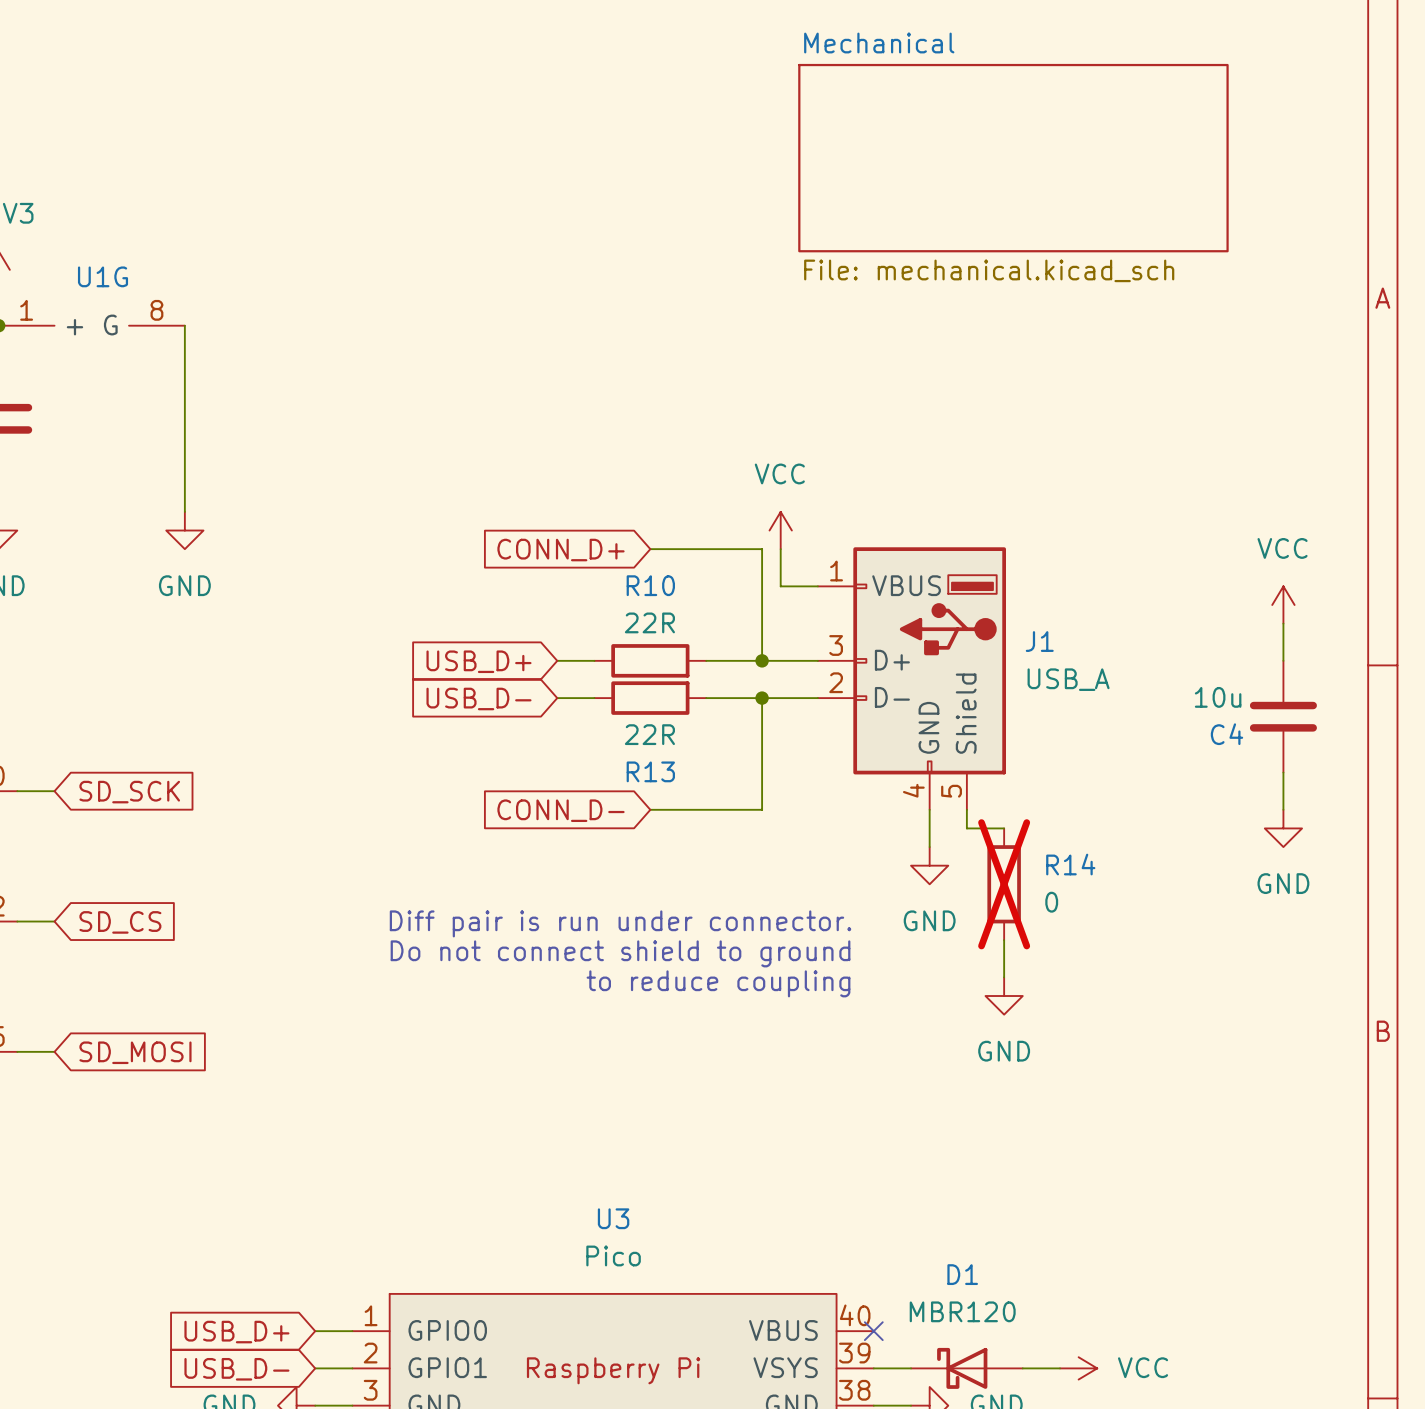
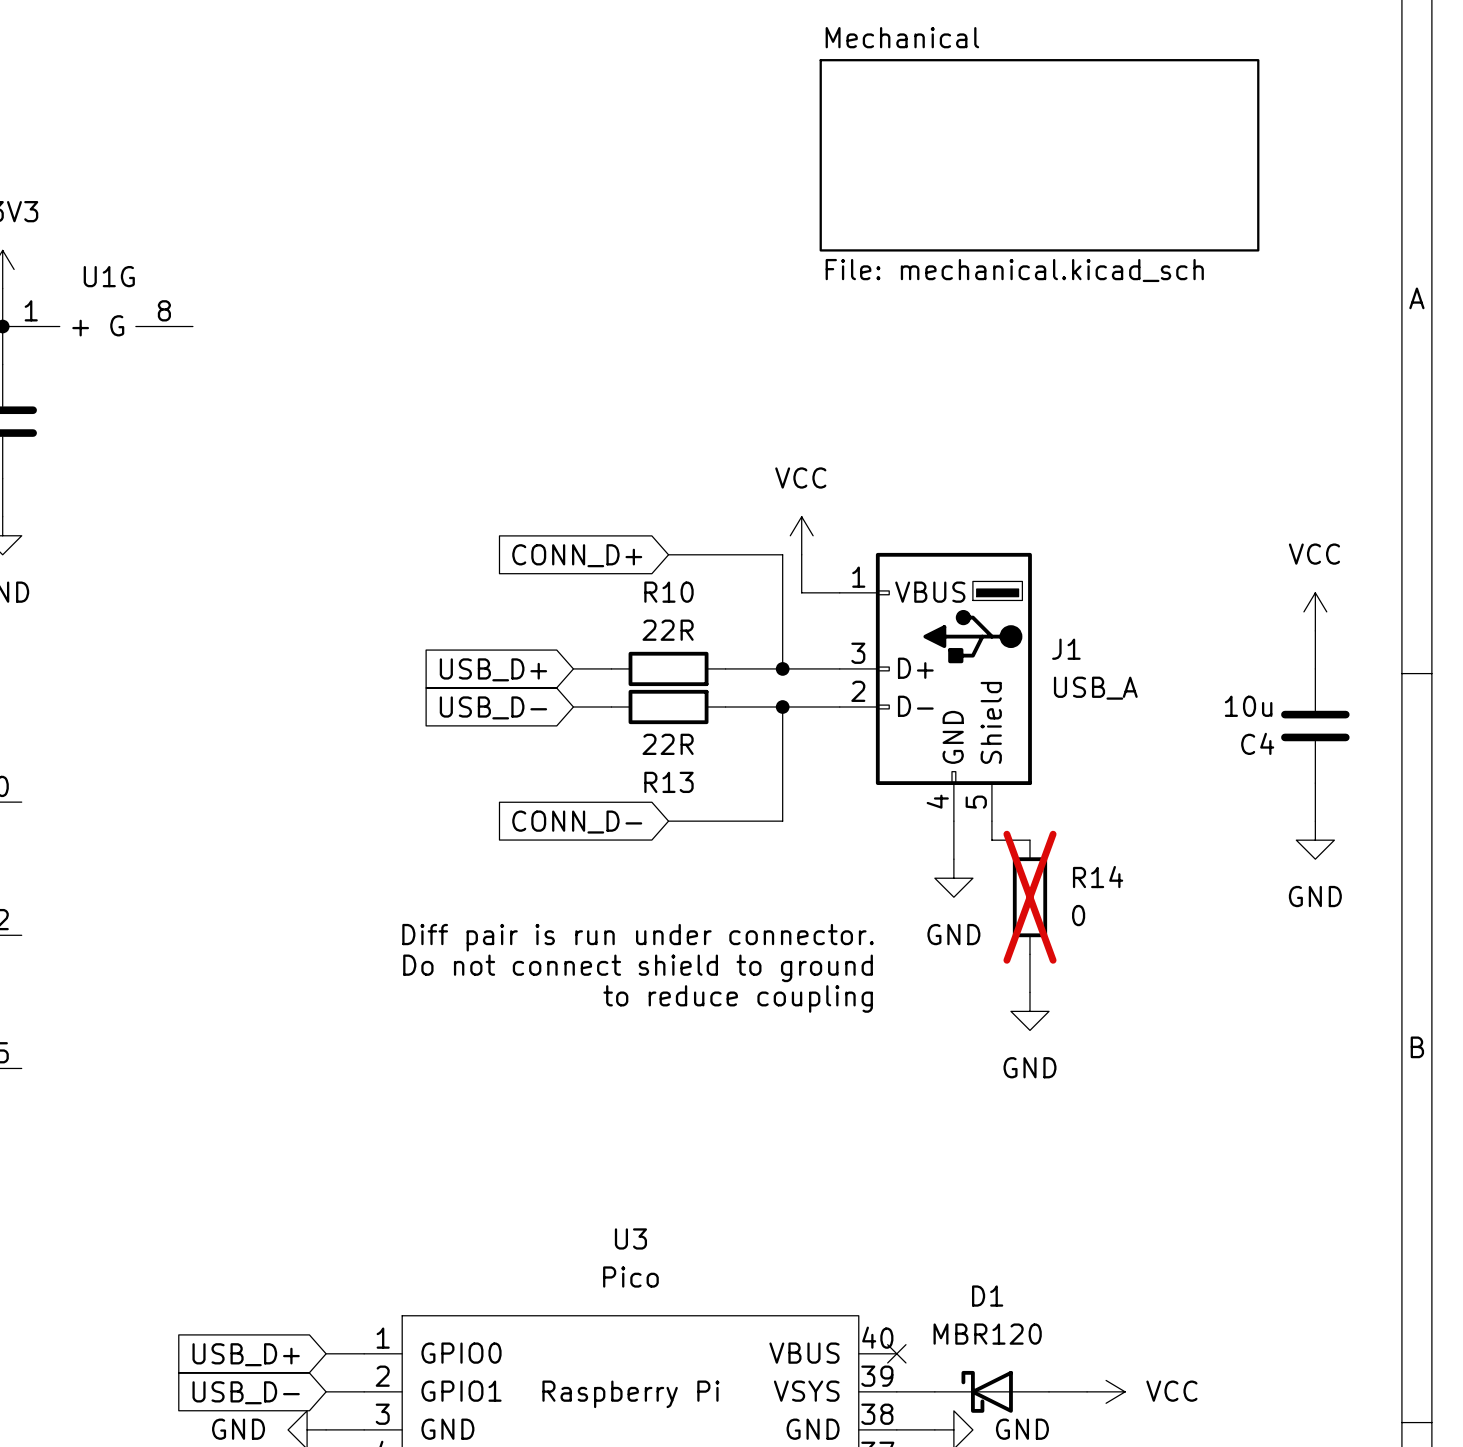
wire: (184, 325) (184, 511) -> none
power symbol: GND (184, 530) -> none
wire: (17, 791) (54, 791) -> none
global label: SD_SCK (129, 792) -> none
wire: (17, 921) (54, 921) -> none
global label: SD_CS (120, 922) -> none
wire: (17, 1051) (54, 1051) -> none
global label: SD_MOSI (135, 1052) -> none

